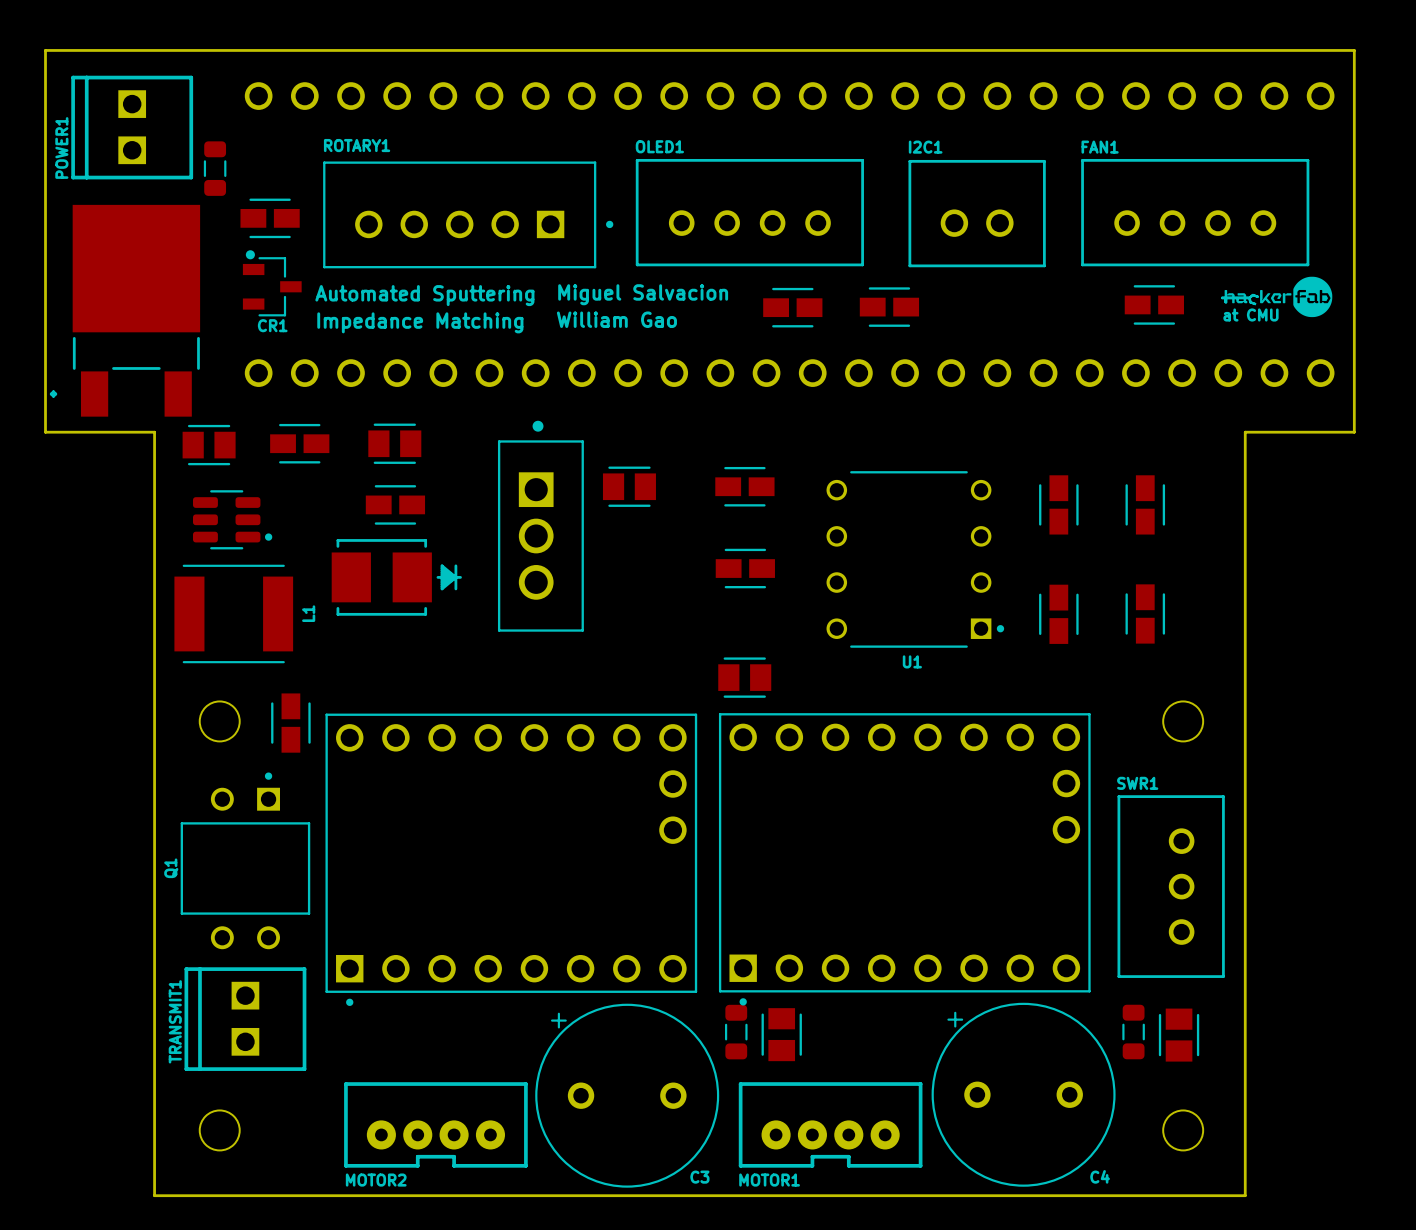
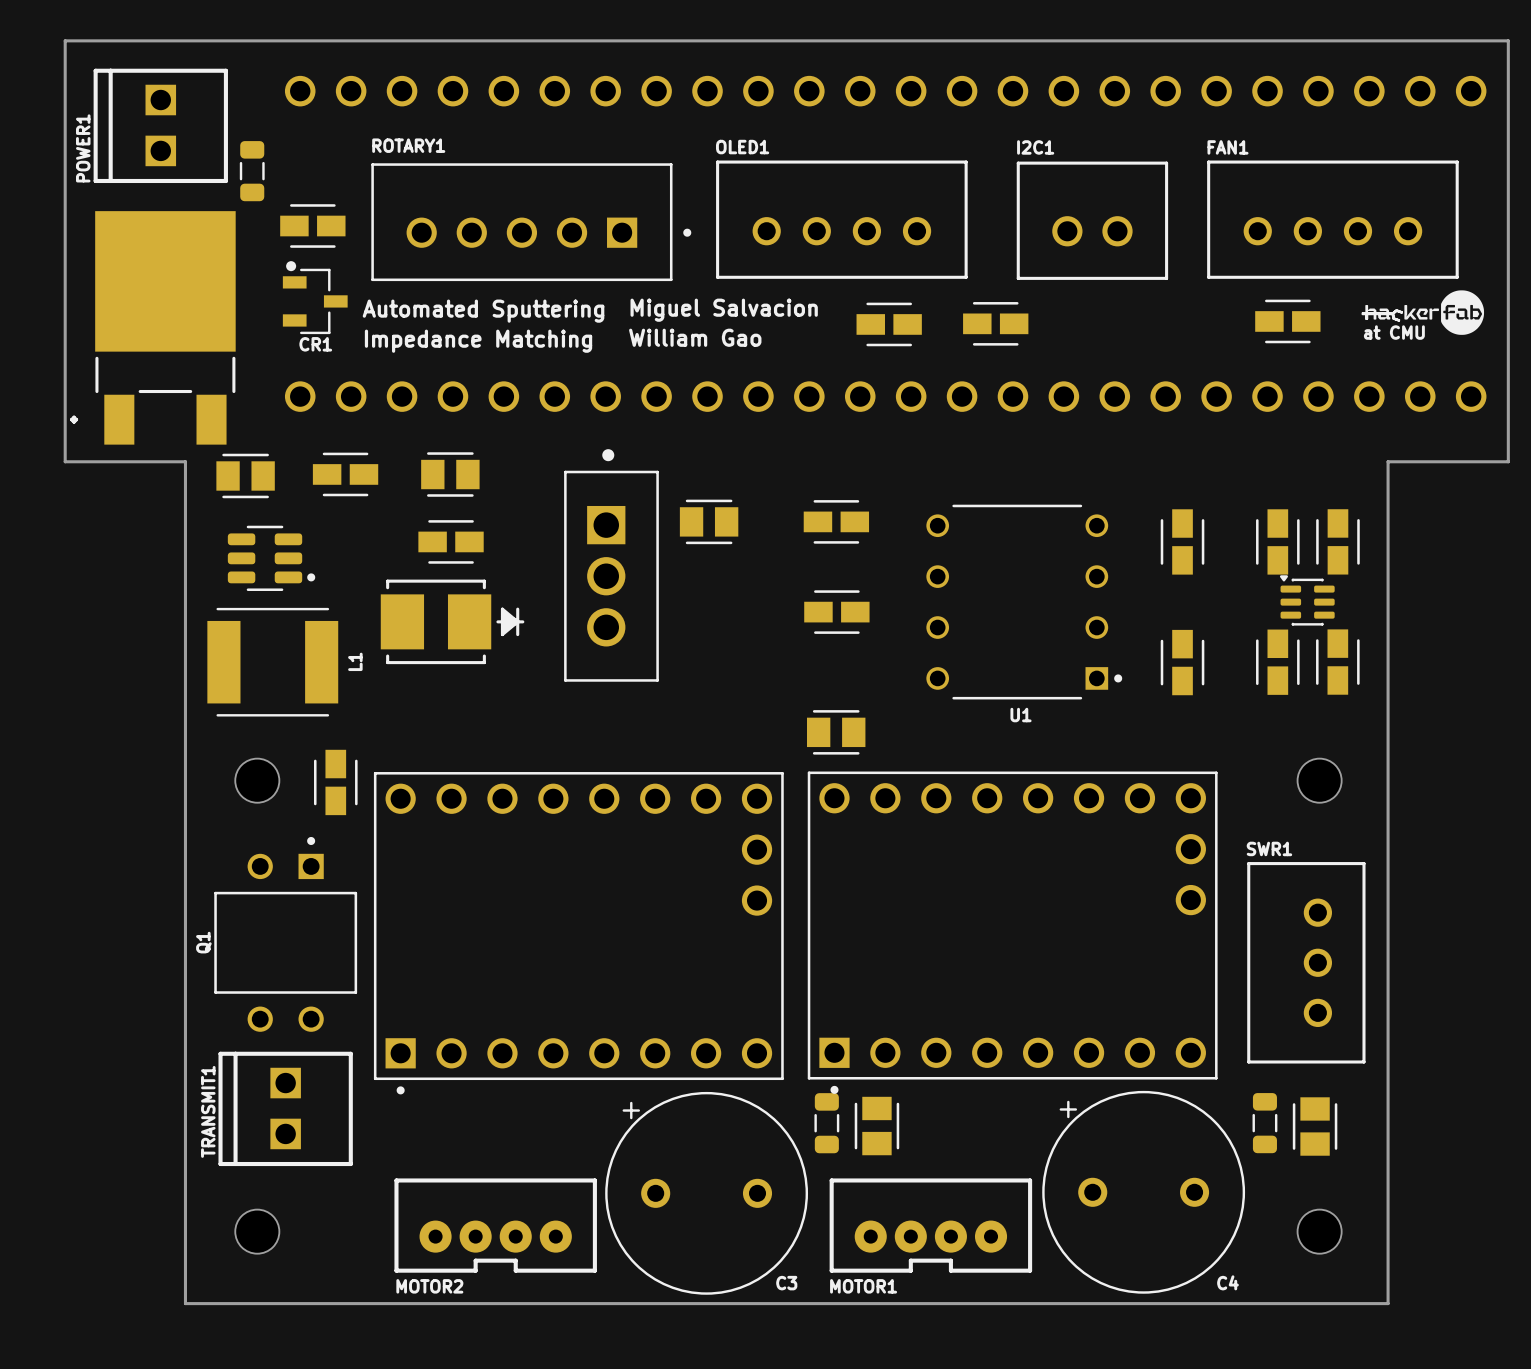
part: none -> (1337, 541)
part: none -> (1307, 600)
part: none -> (1337, 662)

